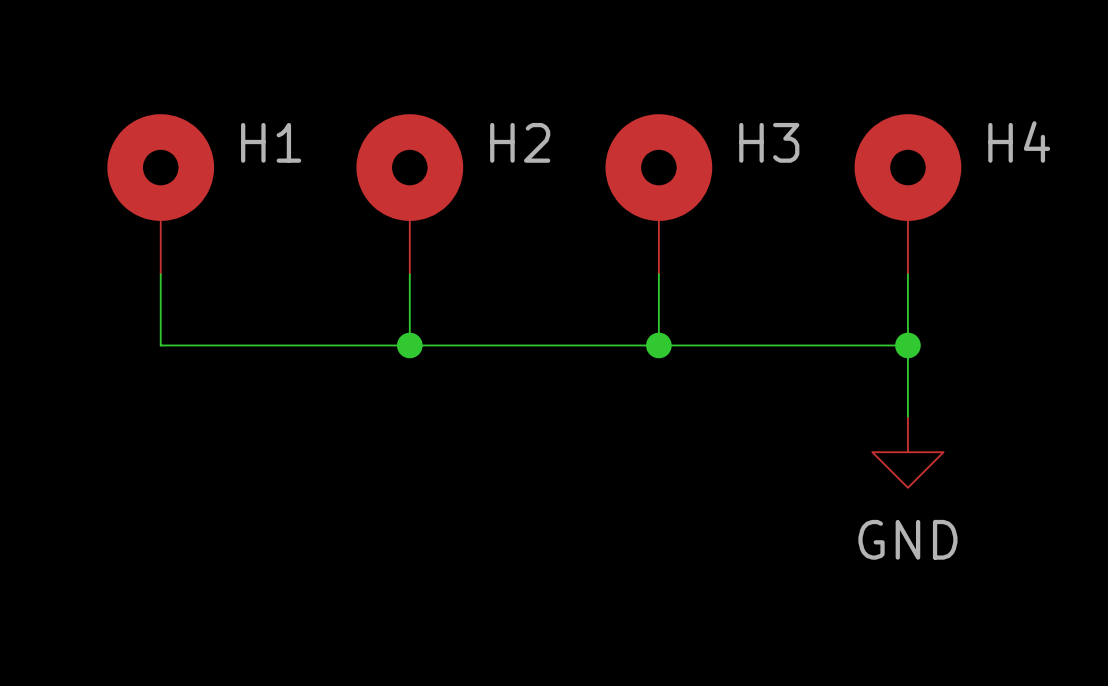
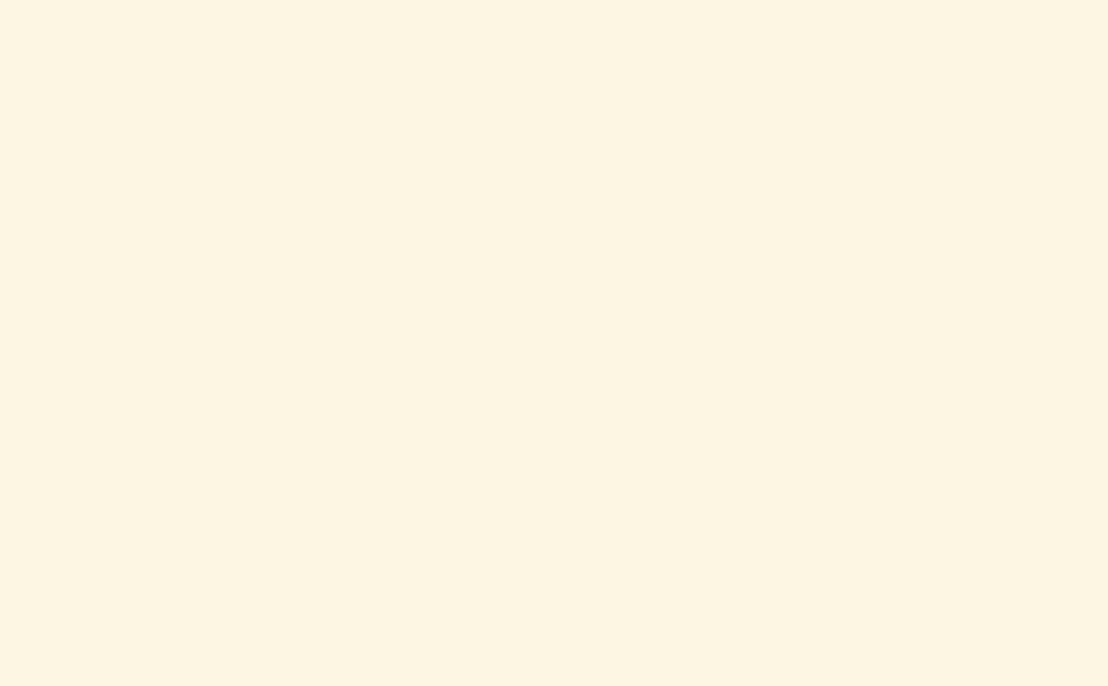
H1: (160, 194) -> none
H2: (409, 194) -> none
H3: (658, 194) -> none
H4: (907, 194) -> none
wire: (160, 274) (160, 345) (907, 345) -> none
wire: (409, 274) (409, 345) -> none
wire: (658, 274) (658, 345) -> none
wire: (907, 274) (907, 416) -> none
junction: (409, 345) -> none
junction: (658, 345) -> none
junction: (907, 345) -> none
power symbol: GND (907, 452) -> none

